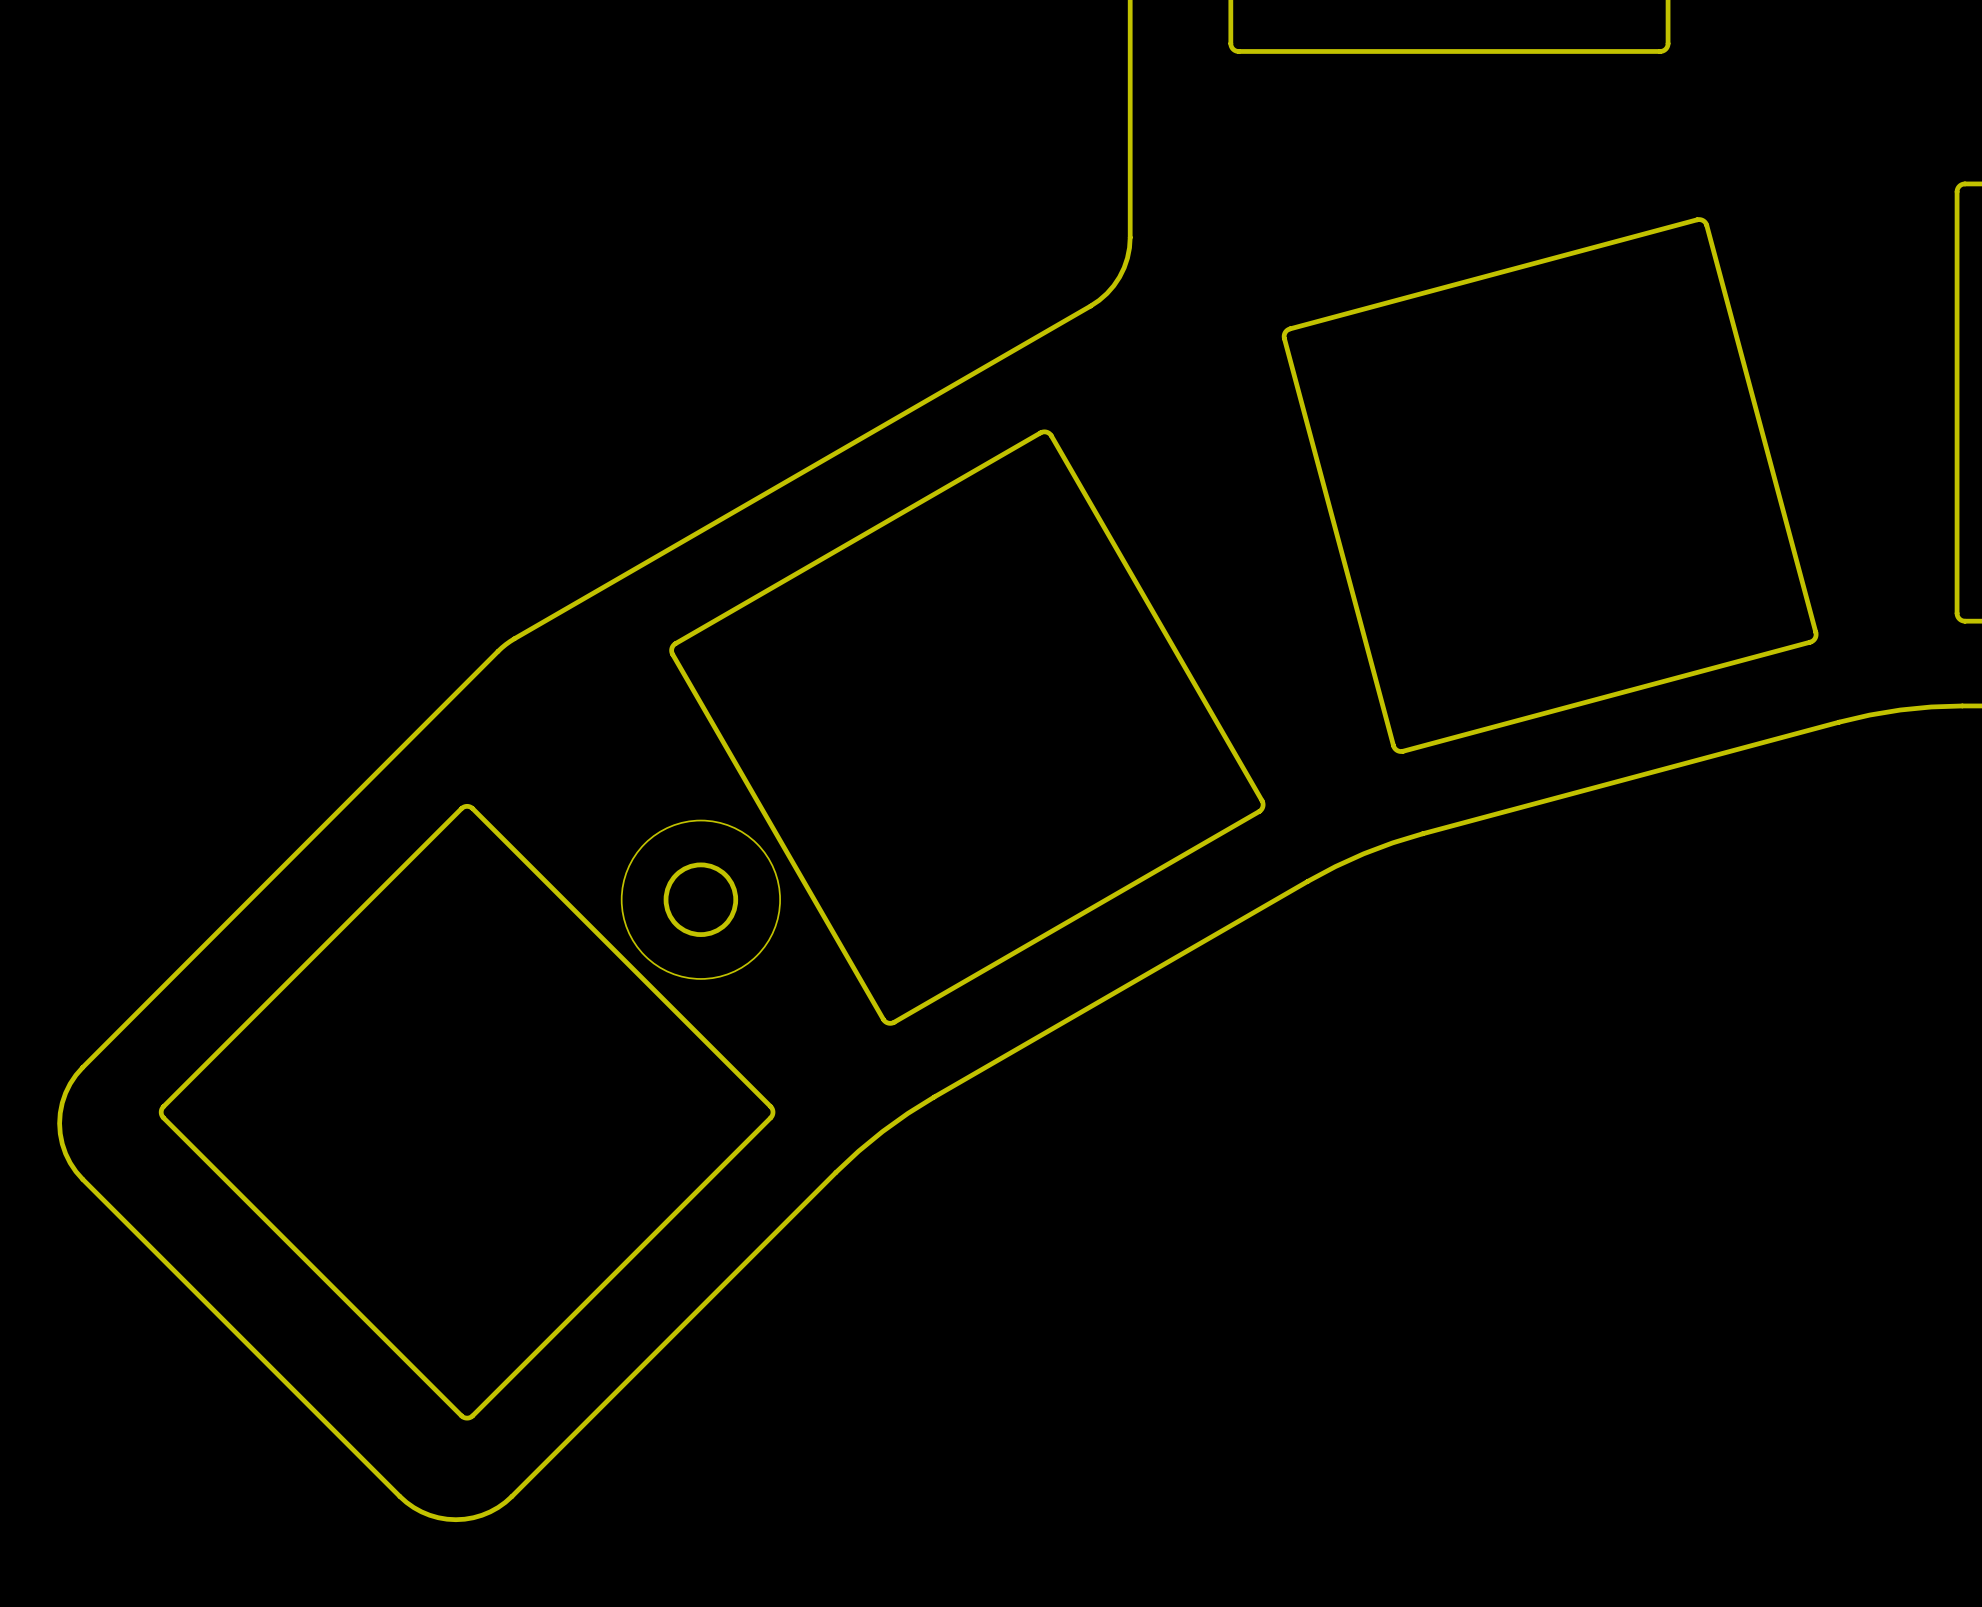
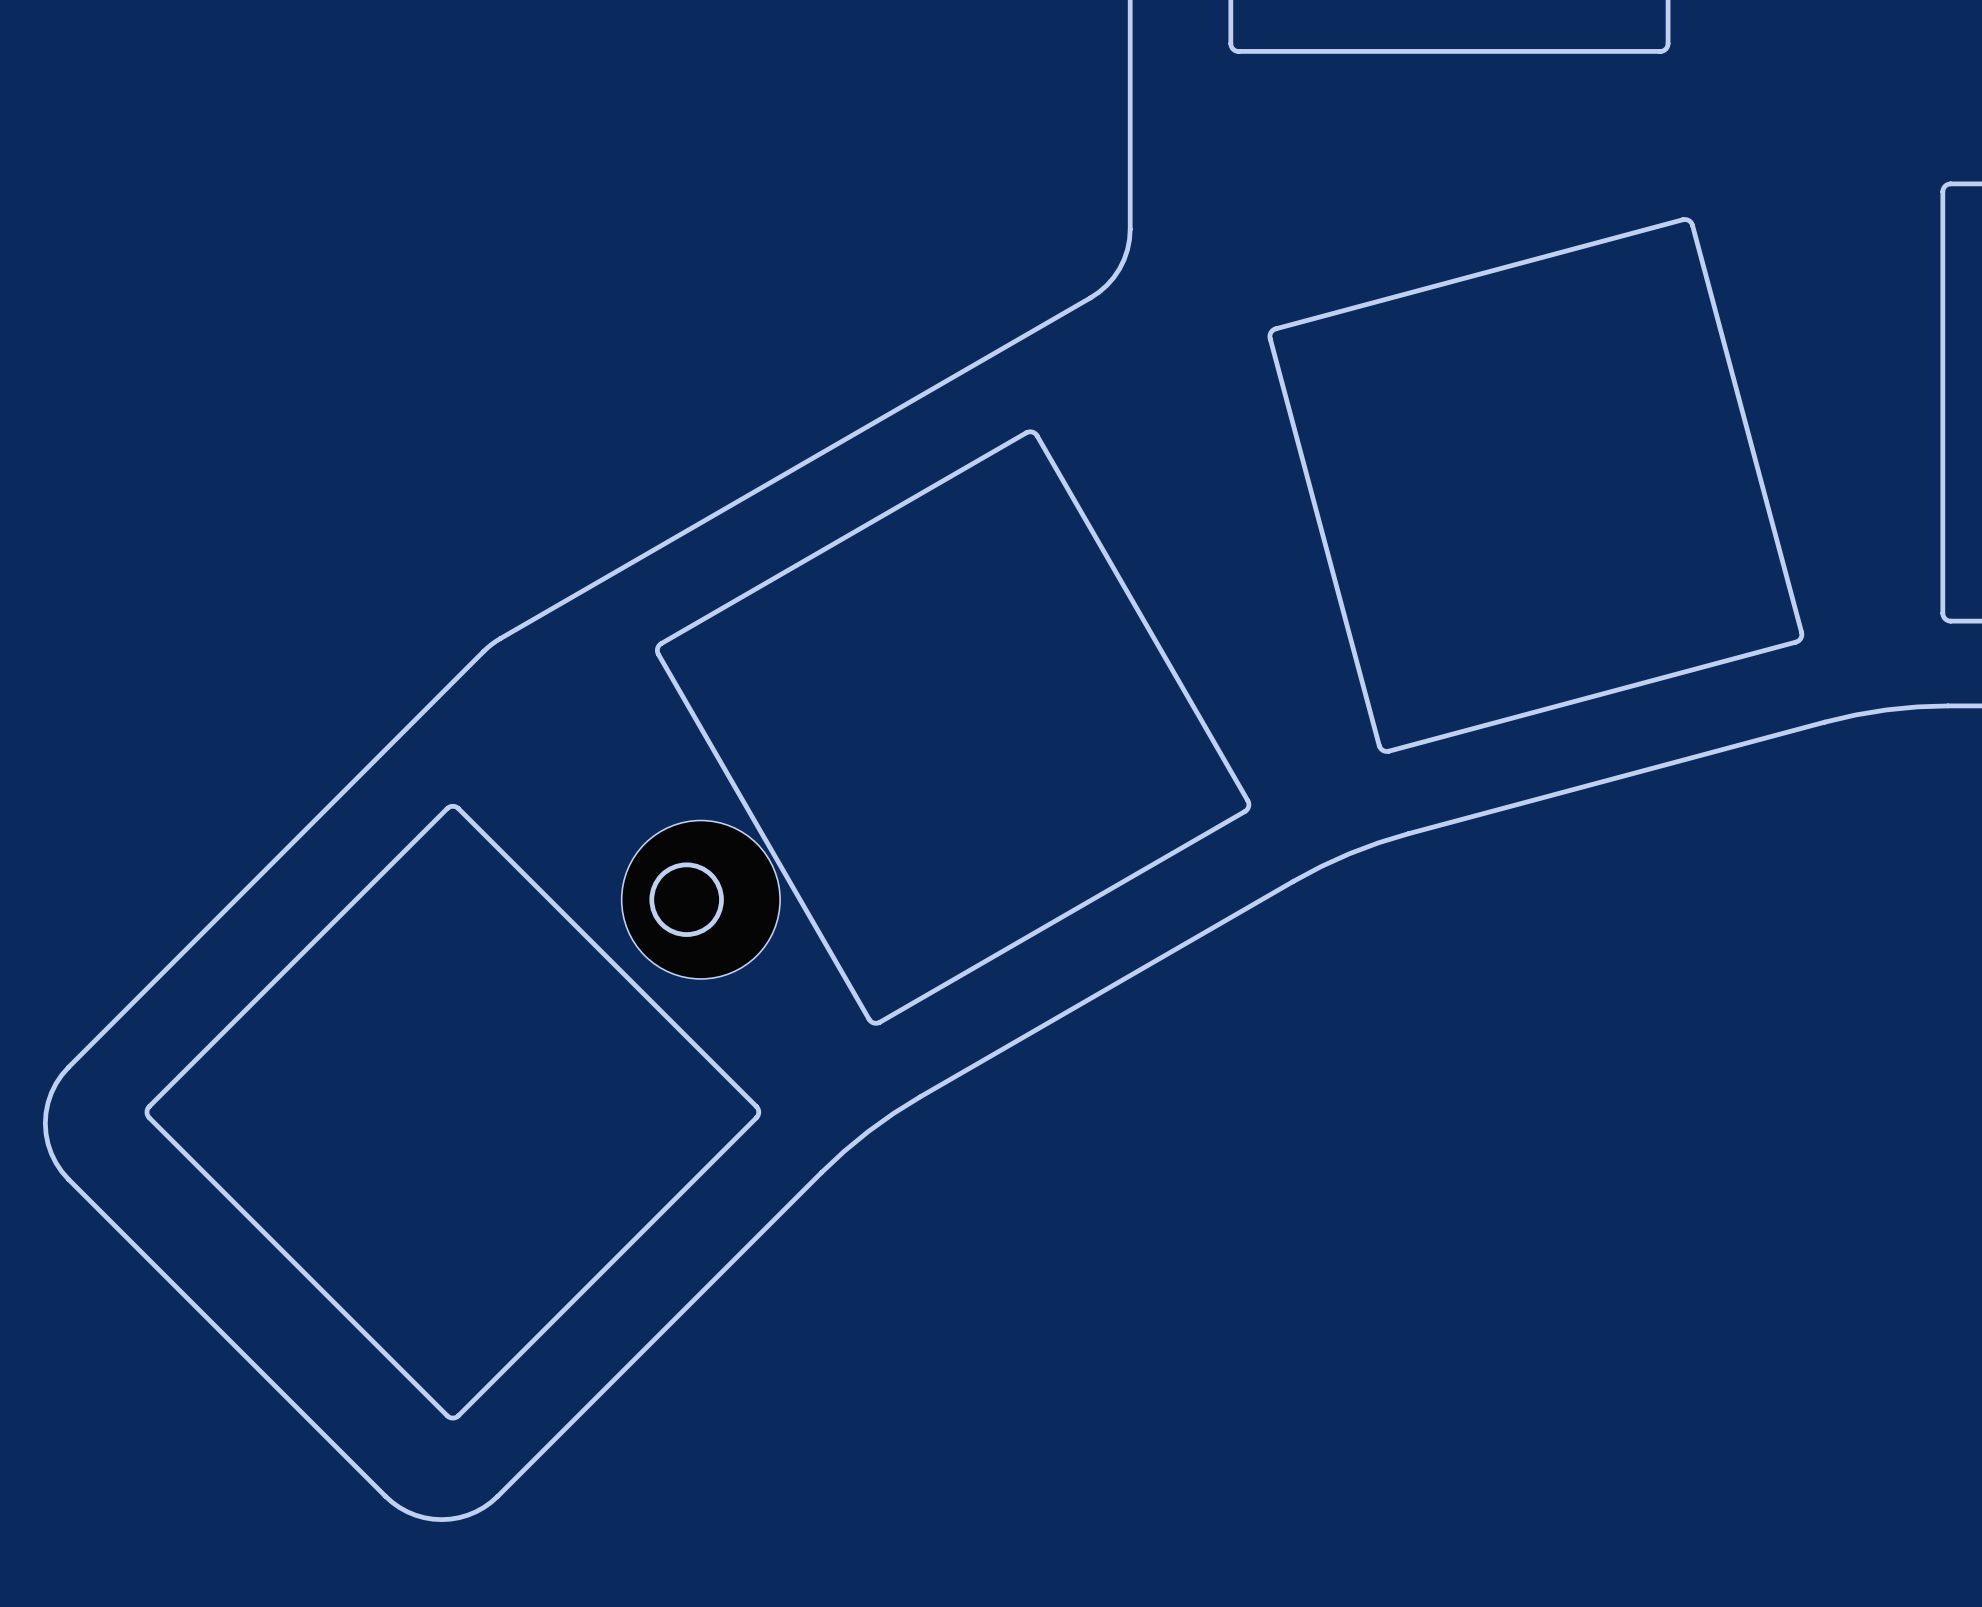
board edge: (1964, 183) (1959, 186) (1957, 191) (1957, 613) (1959, 618) (1964, 621) -> (1964, 183) (1948, 184) (1942, 191) (1942, 613) (1948, 620) (1964, 621)
board edge: (1697, 219) (1290, 328) (1285, 332) (1284, 338) (1393, 745) (1397, 750) (1403, 751) (1810, 642) (1815, 638) (1815, 632) (1706, 225) (1703, 220) (1700, 219) (1699, 219) (1698, 219) (1697, 219) -> (1682, 219) (1275, 328) (1270, 332) (1270, 338) (1379, 745) (1382, 750) (1388, 751) (1795, 642) (1800, 638) (1801, 632) (1692, 225) (1688, 220) (1685, 219) (1683, 219) (1682, 219)
board edge: (1130, 229) (1127, 258) (1119, 277) (1107, 293) (1090, 306) (505, 644) (82, 1067) (70, 1083) (62, 1102) (60, 1133) (65, 1153) (75, 1171) (399, 1496) (413, 1507) (429, 1515) (455, 1519) (473, 1517) (498, 1507) (511, 1496) (835, 1172) (882, 1131) (934, 1097) (1335, 866) (1392, 842) (1422, 833) (1839, 722) (1900, 710) (1962, 705) -> (1130, 229) (1127, 249) (1119, 268) (1107, 285) (1090, 297) (491, 644) (68, 1067) (55, 1083) (48, 1102) (46, 1133) (51, 1153) (61, 1171) (385, 1496) (399, 1507) (424, 1517) (441, 1519) (467, 1515) (483, 1507) (497, 1496) (821, 1172) (868, 1131) (920, 1096) (1321, 866) (1349, 853) (1408, 833) (1825, 722) (1886, 709) (1962, 705)
board edge: (1040, 432) (675, 643) (671, 648) (672, 654) (883, 1019) (888, 1023) (894, 1022) (1259, 811) (1262, 806) (1262, 800) (1051, 435) (1046, 432) (1040, 432) -> (1026, 432) (661, 643) (657, 648) (658, 654) (869, 1019) (873, 1023) (879, 1022) (1244, 811) (1248, 806) (1247, 800) (1037, 435) (1032, 432) (1026, 432)
board edge: (472, 808) (770, 1106) (773, 1112) (770, 1117) (472, 1415) (467, 1418) (461, 1415) (163, 1117) (161, 1112) (163, 1106) (461, 808) (467, 806) (472, 808) -> (458, 808) (756, 1106) (758, 1112) (756, 1117) (458, 1415) (452, 1418) (447, 1415) (149, 1117) (146, 1112) (149, 1106) (447, 808) (452, 806) (458, 808)
round board edge position: (700, 899) -> (686, 899)

